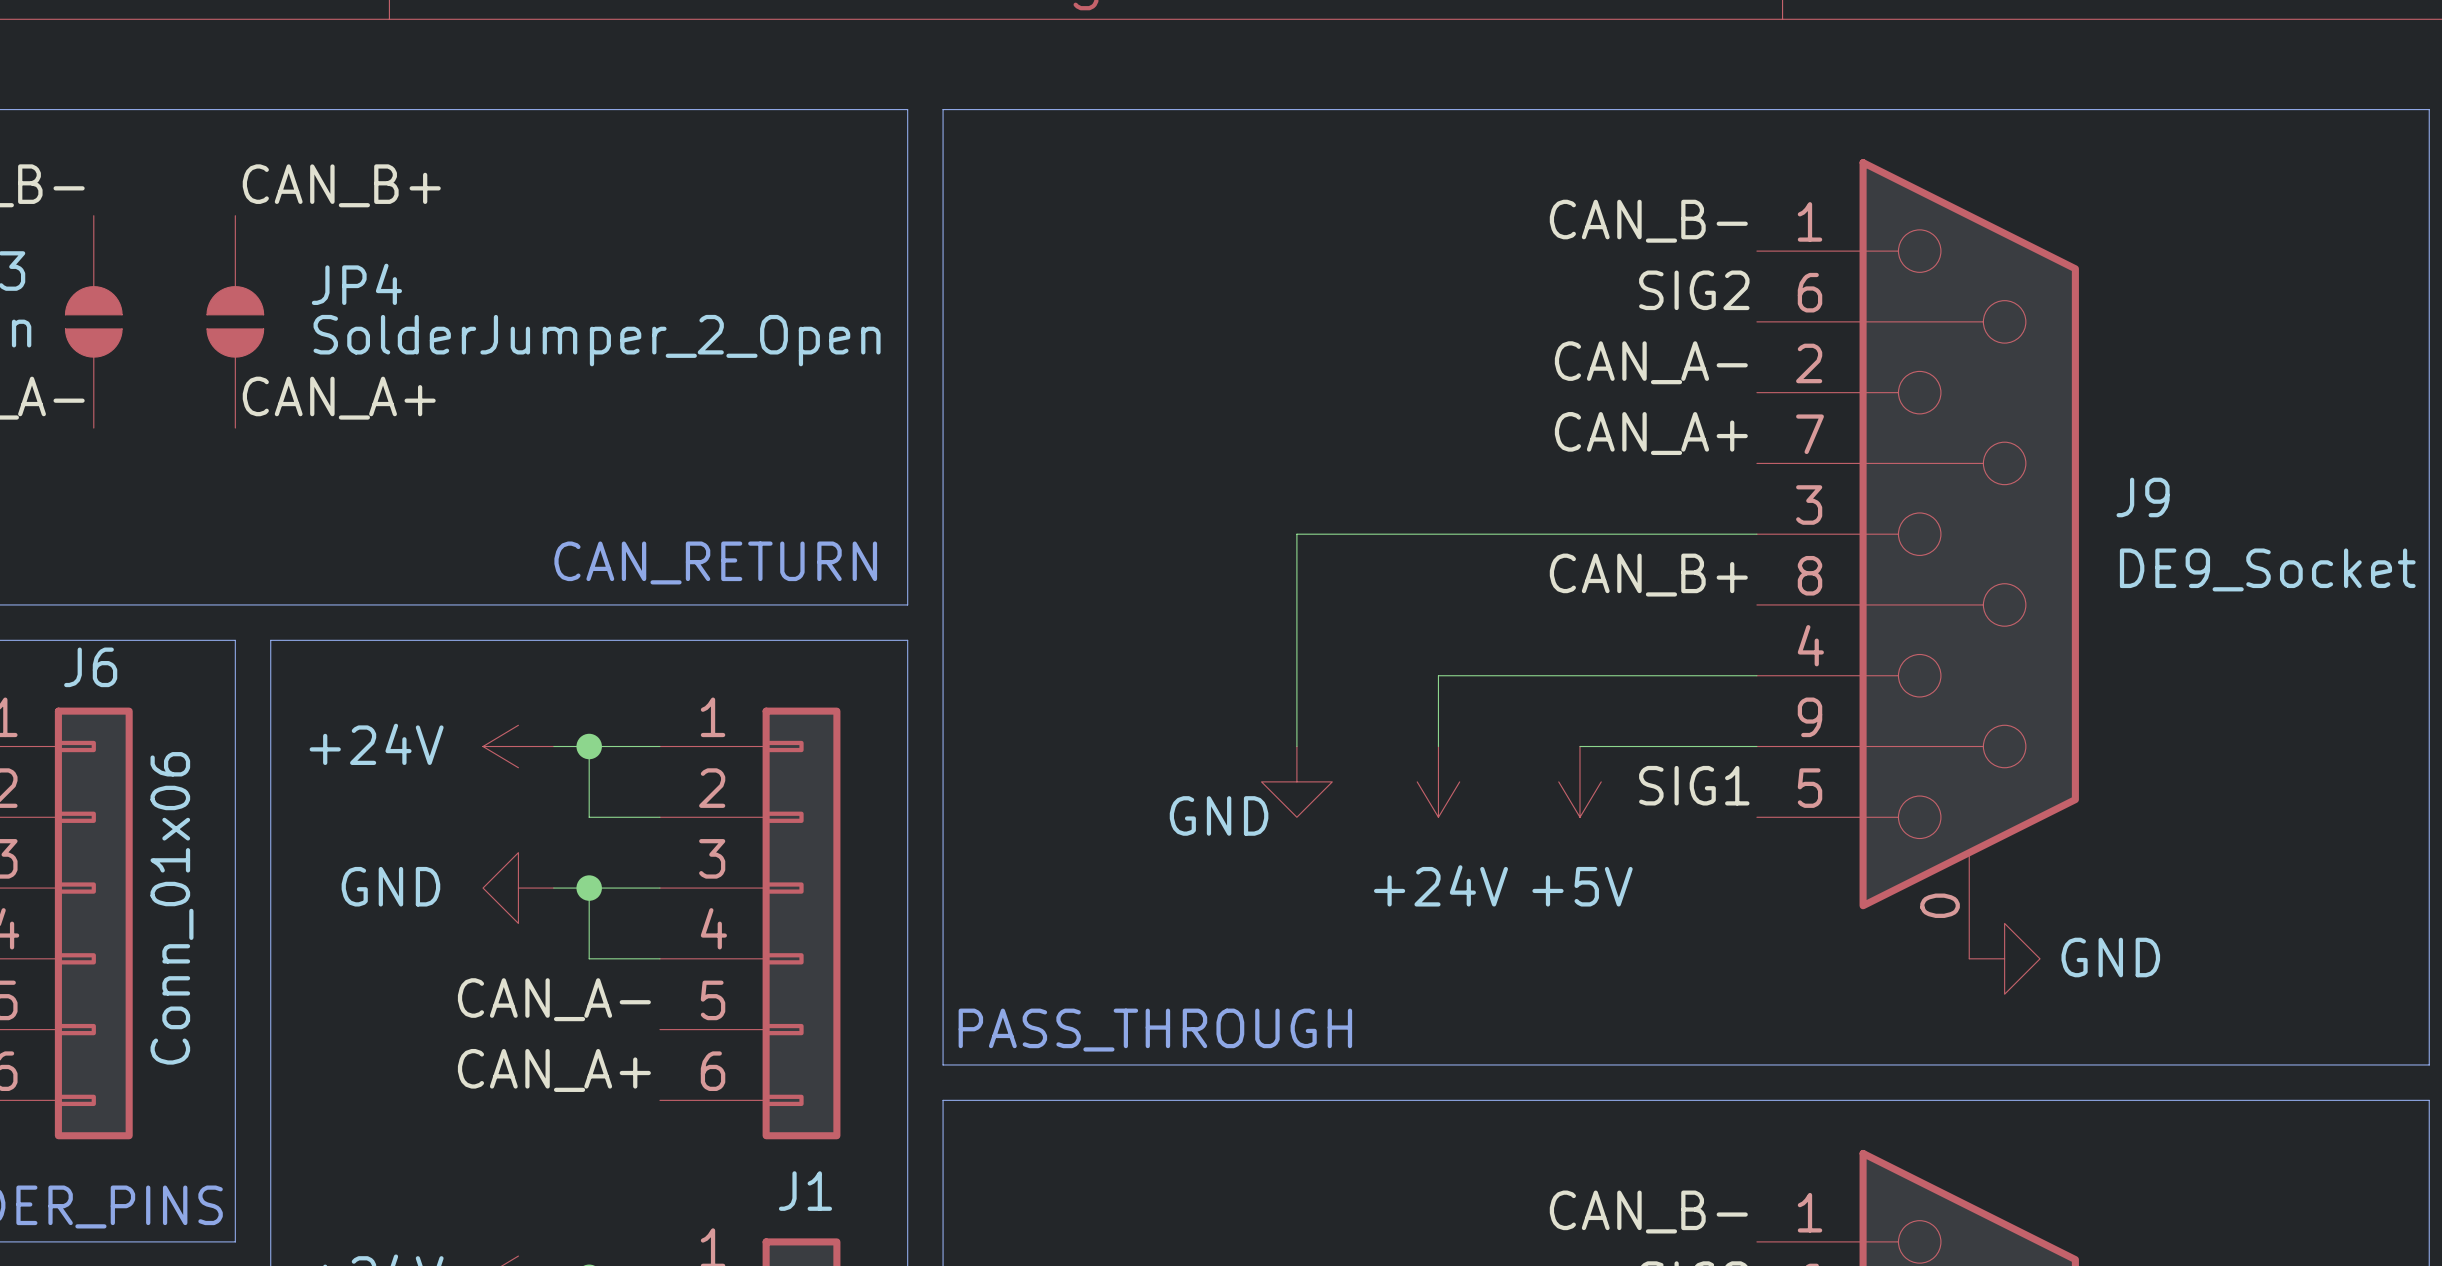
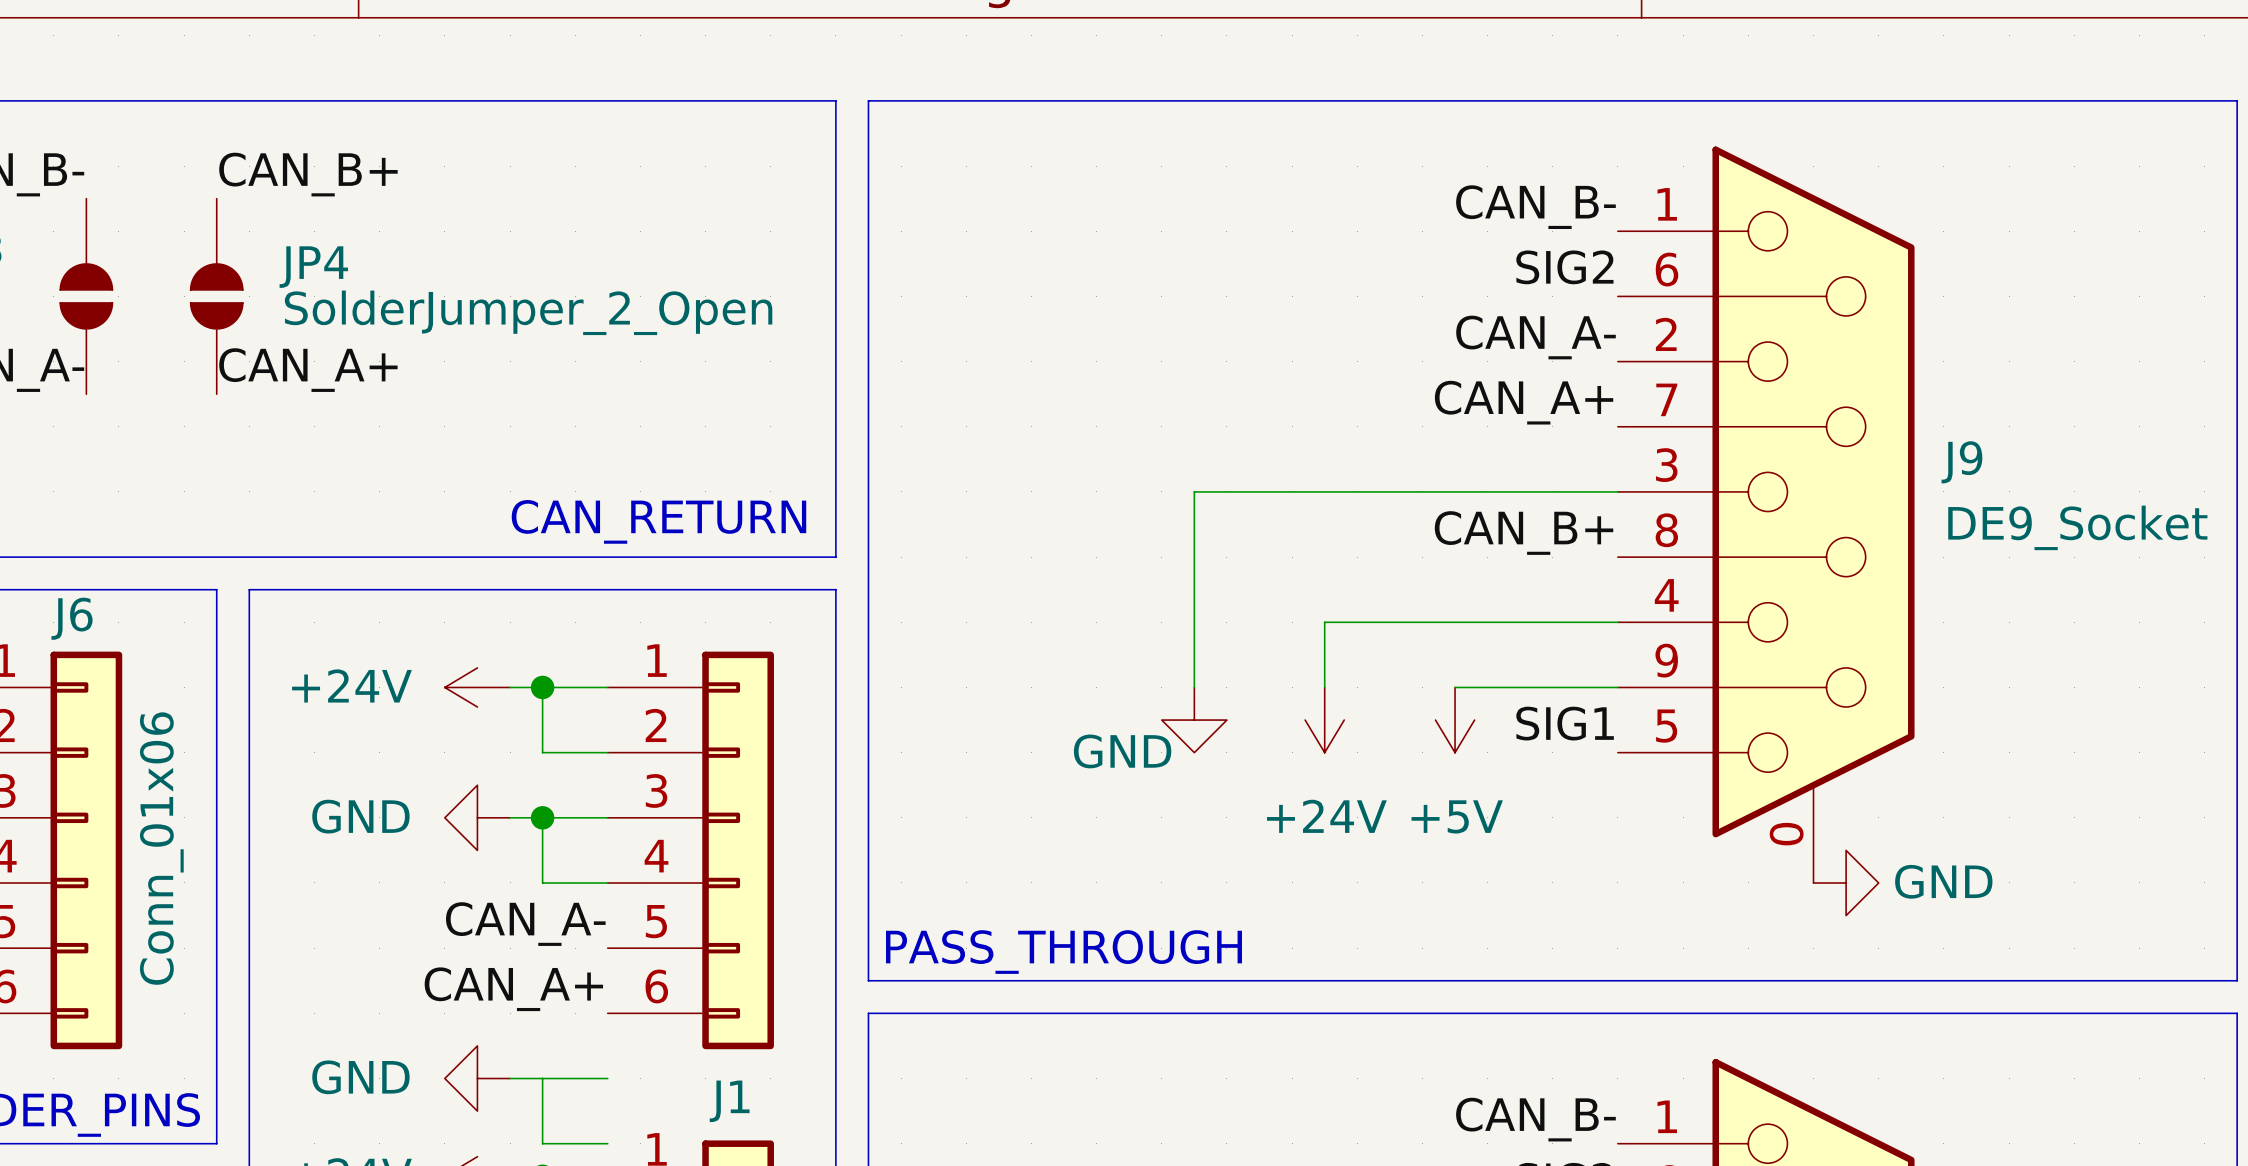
power symbol: none -> GND (477, 1078)
wire: none -> (510, 1078) (607, 1078)
wire: none -> (542, 1078) (542, 1143) (607, 1143)

